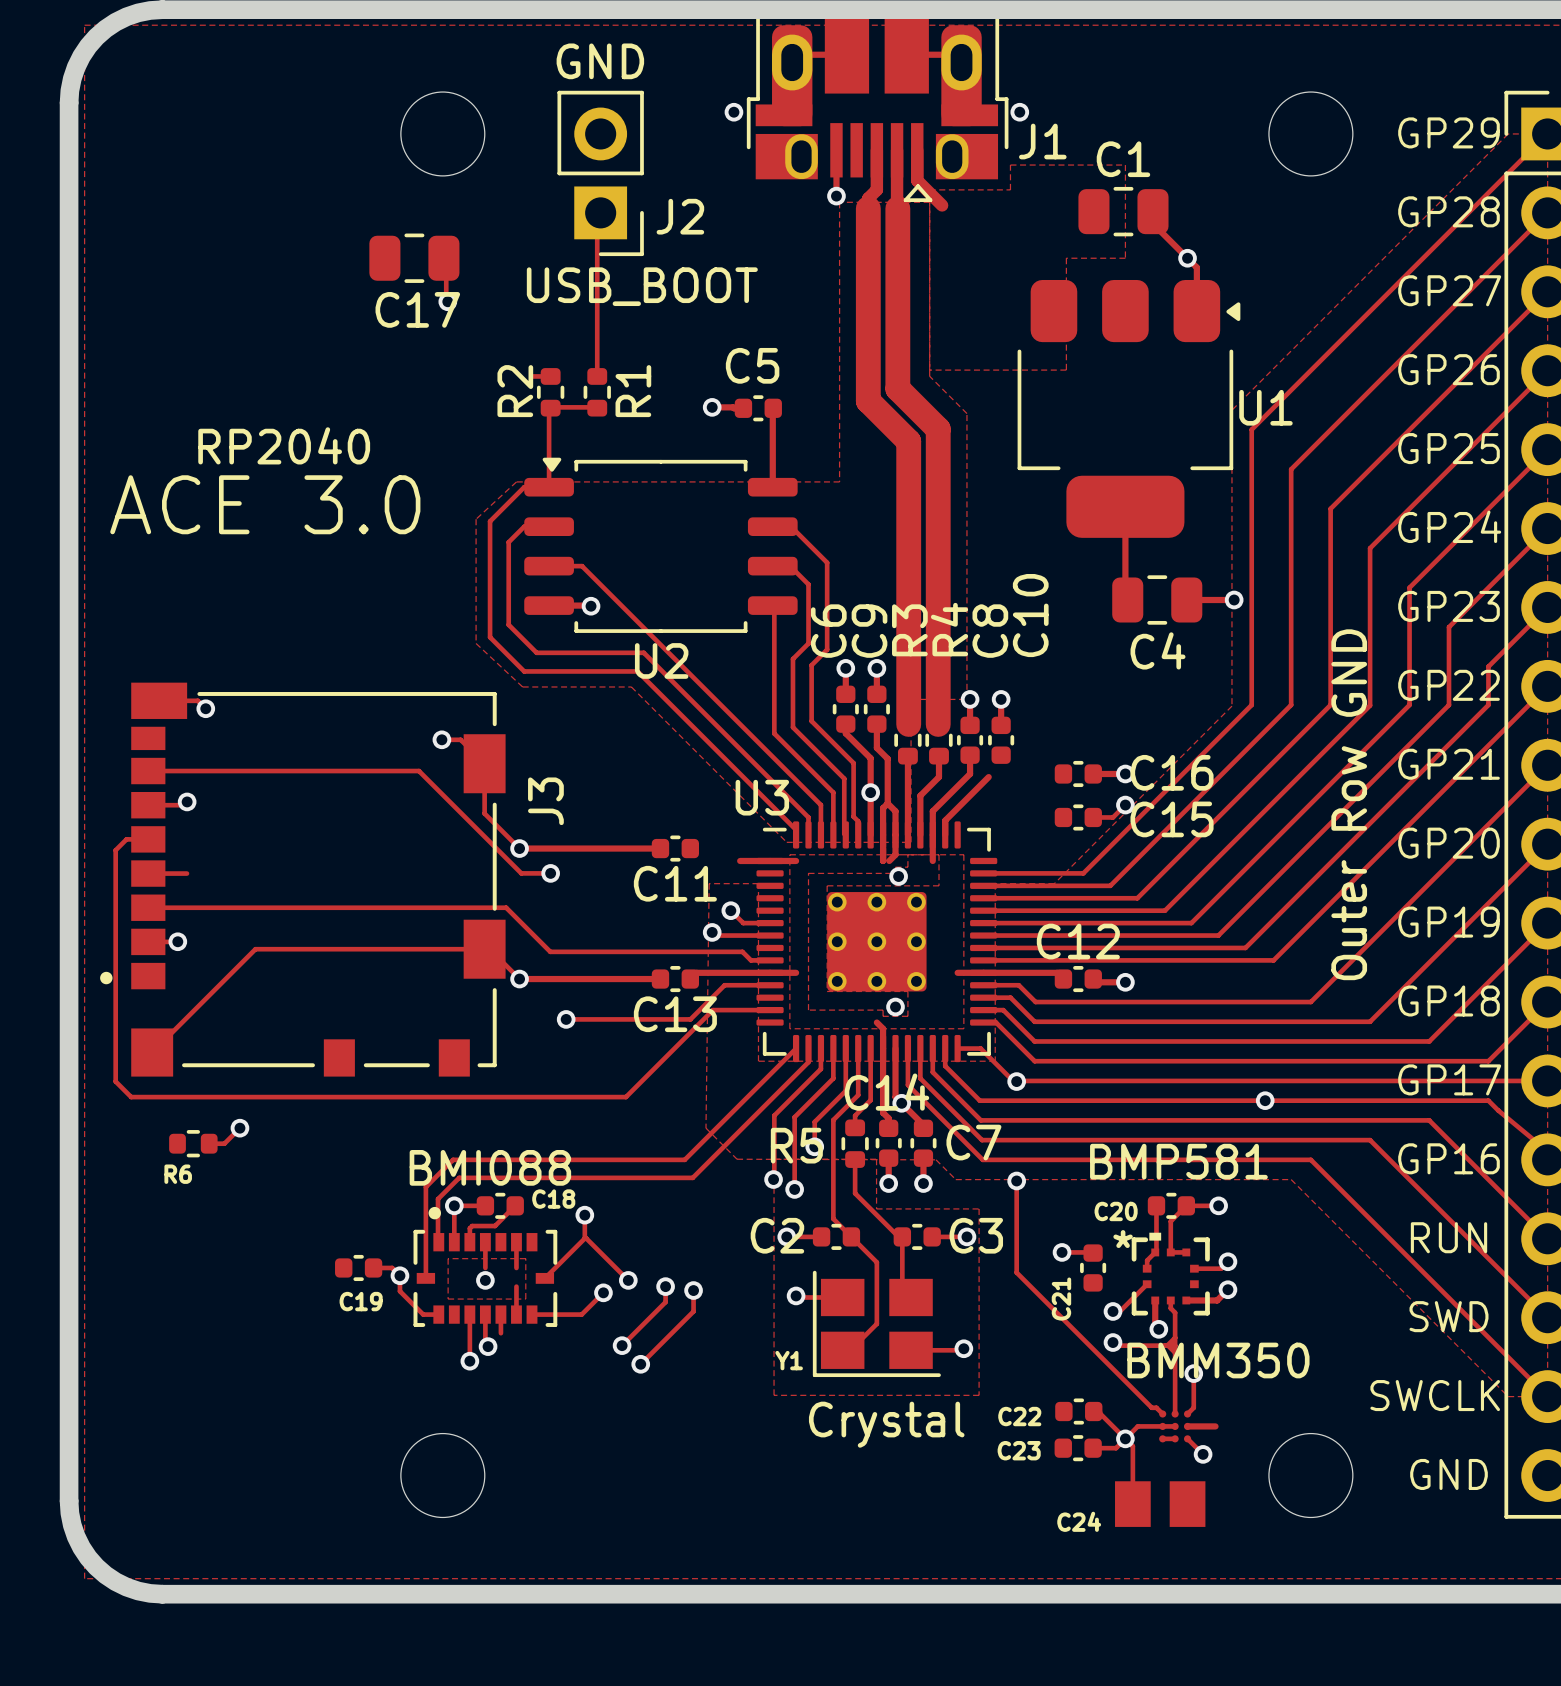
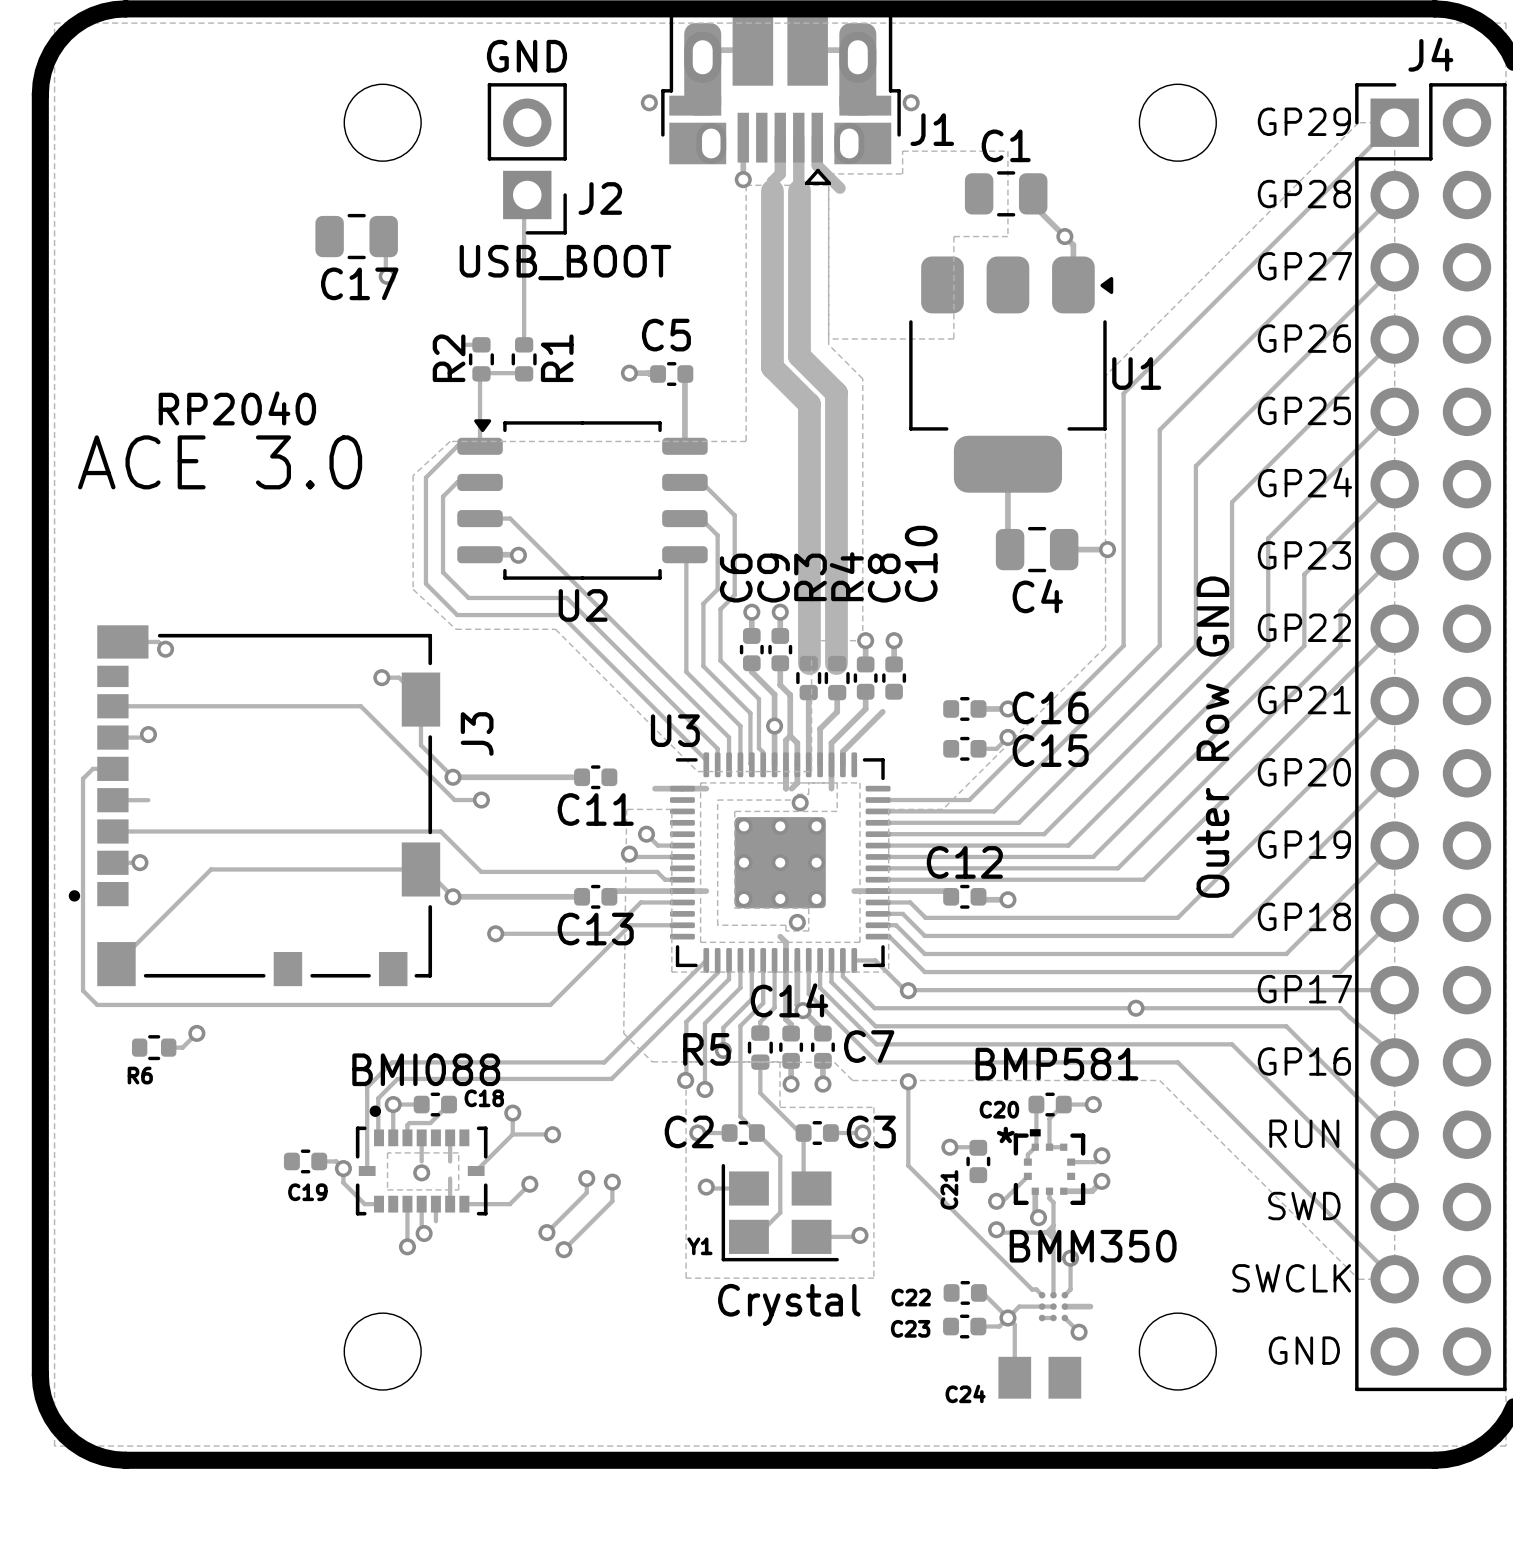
track: (586, 1238) (628, 1280) -> (514, 1134) (552, 1134)
via position: (628, 1280) -> (552, 1134)

